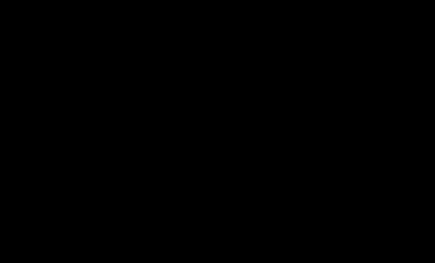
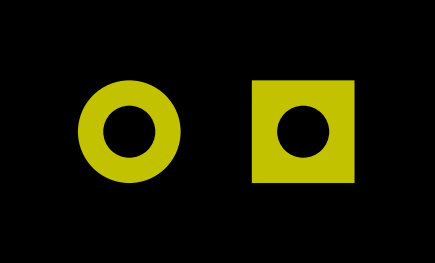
part: none -> (216, 131)

